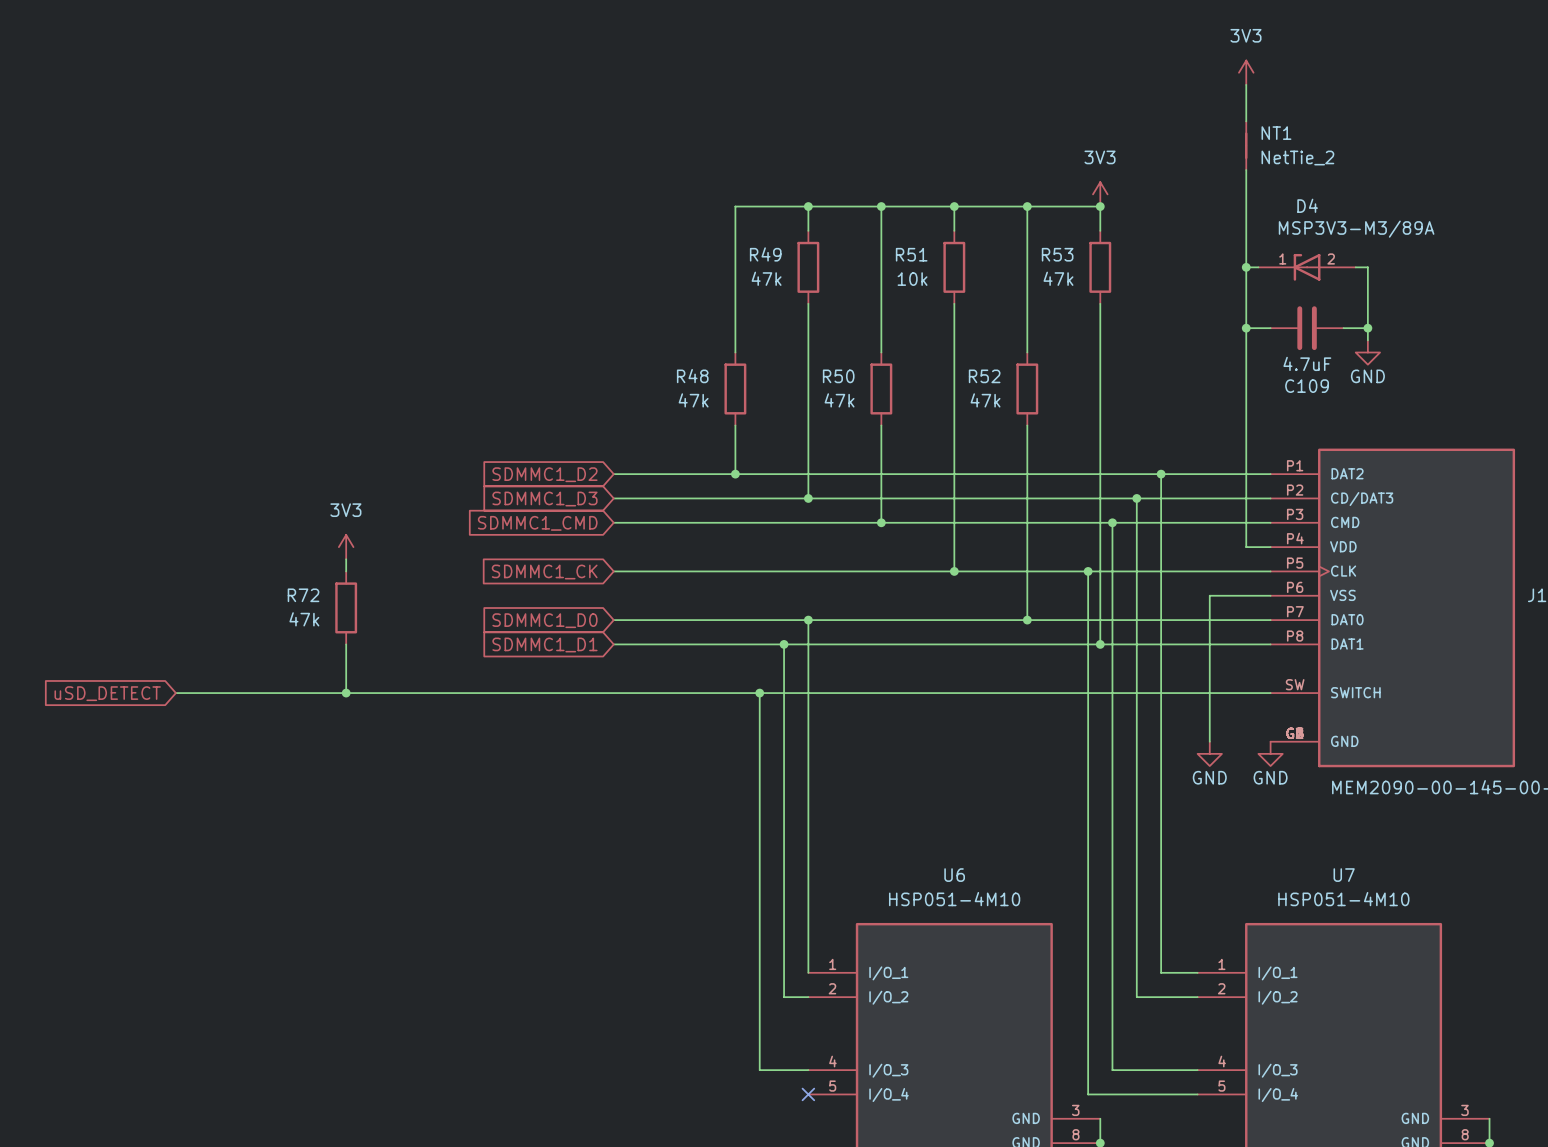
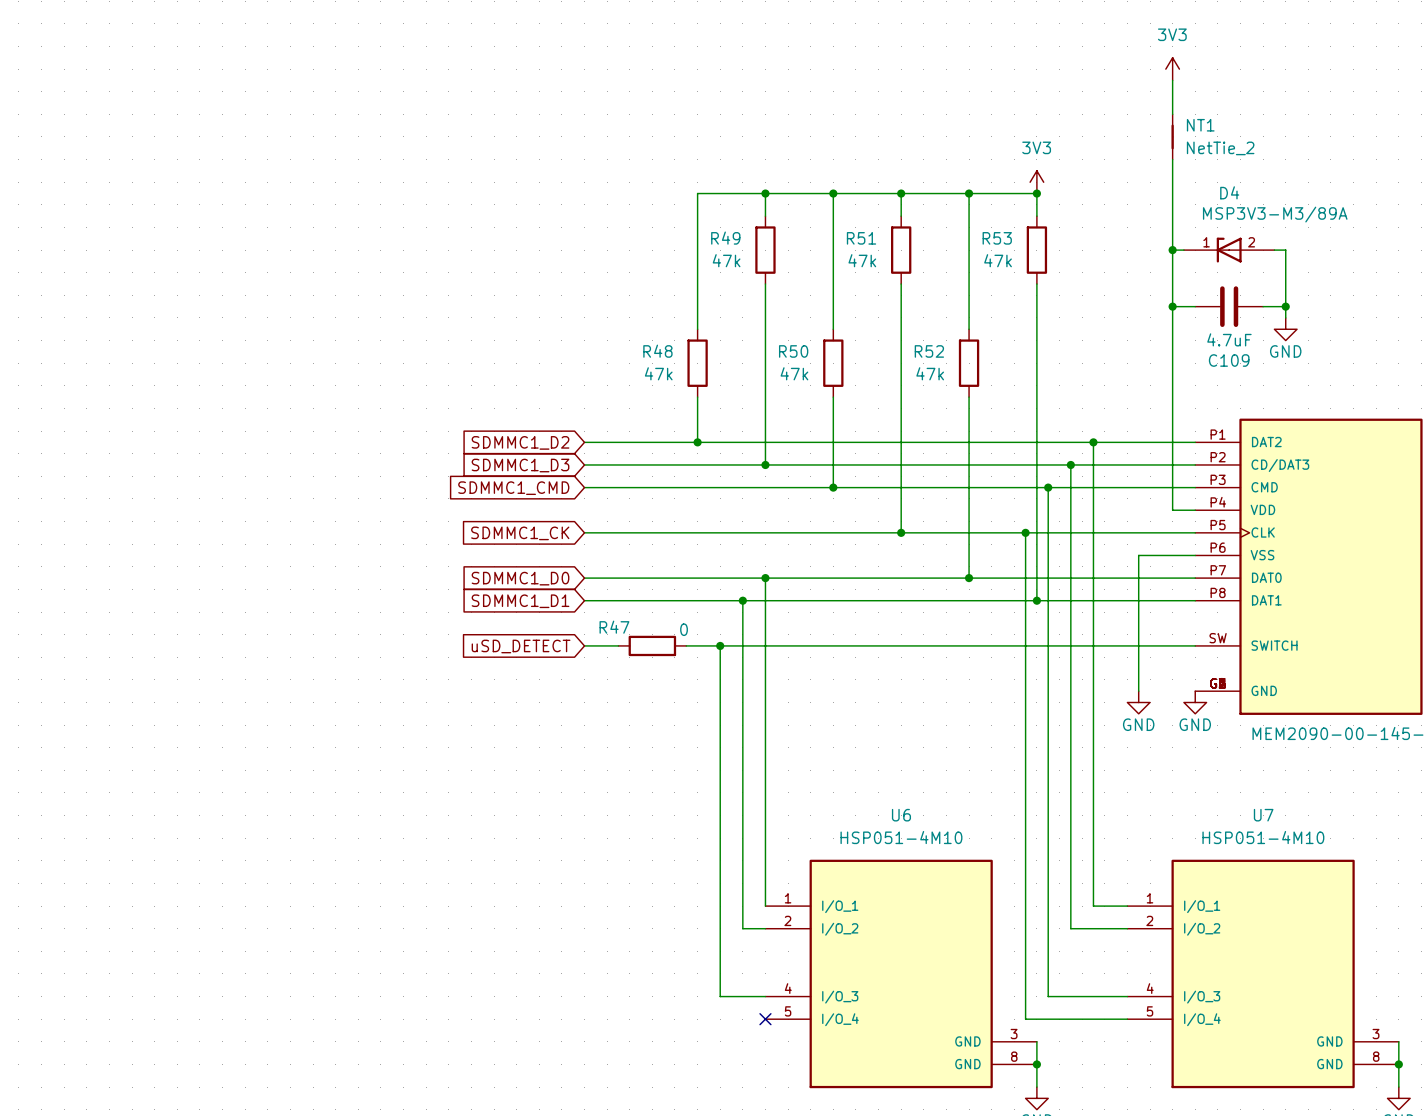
R51 value: 10k (912, 279) -> 47k (862, 260)
power symbol: 3V3 (346, 547) -> none
wire: (346, 559) (346, 571) -> none
R72: 47k (346, 607) -> none
wire: (346, 644) (346, 693) -> none
global label: uSD_DETECT (107, 693) -> none
wire: (175, 693) (613, 693) -> none
junction: (346, 693) -> none
global label: none -> uSD_DETECT (521, 646)
wire: (650, 693) (723, 693) -> none
R47: none -> 0 (652, 645)

